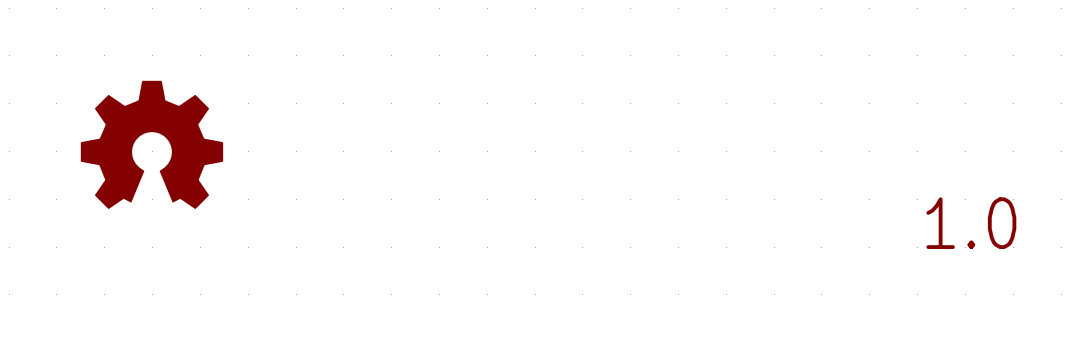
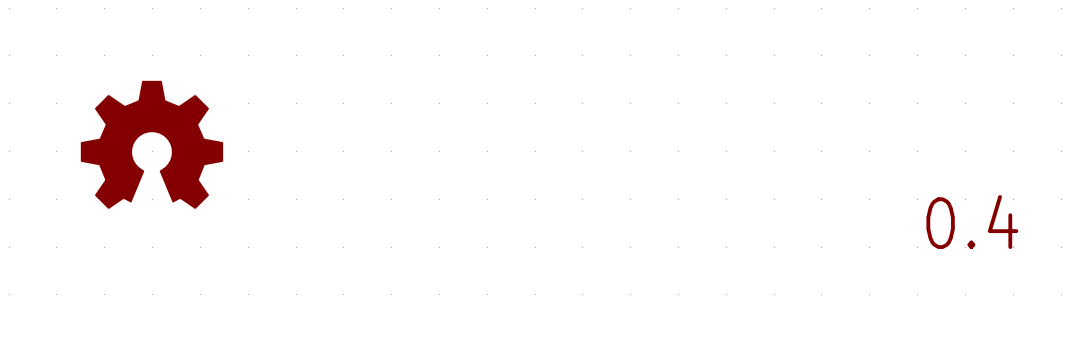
text: 1.0 (971, 223) -> 0.4 (972, 222)

